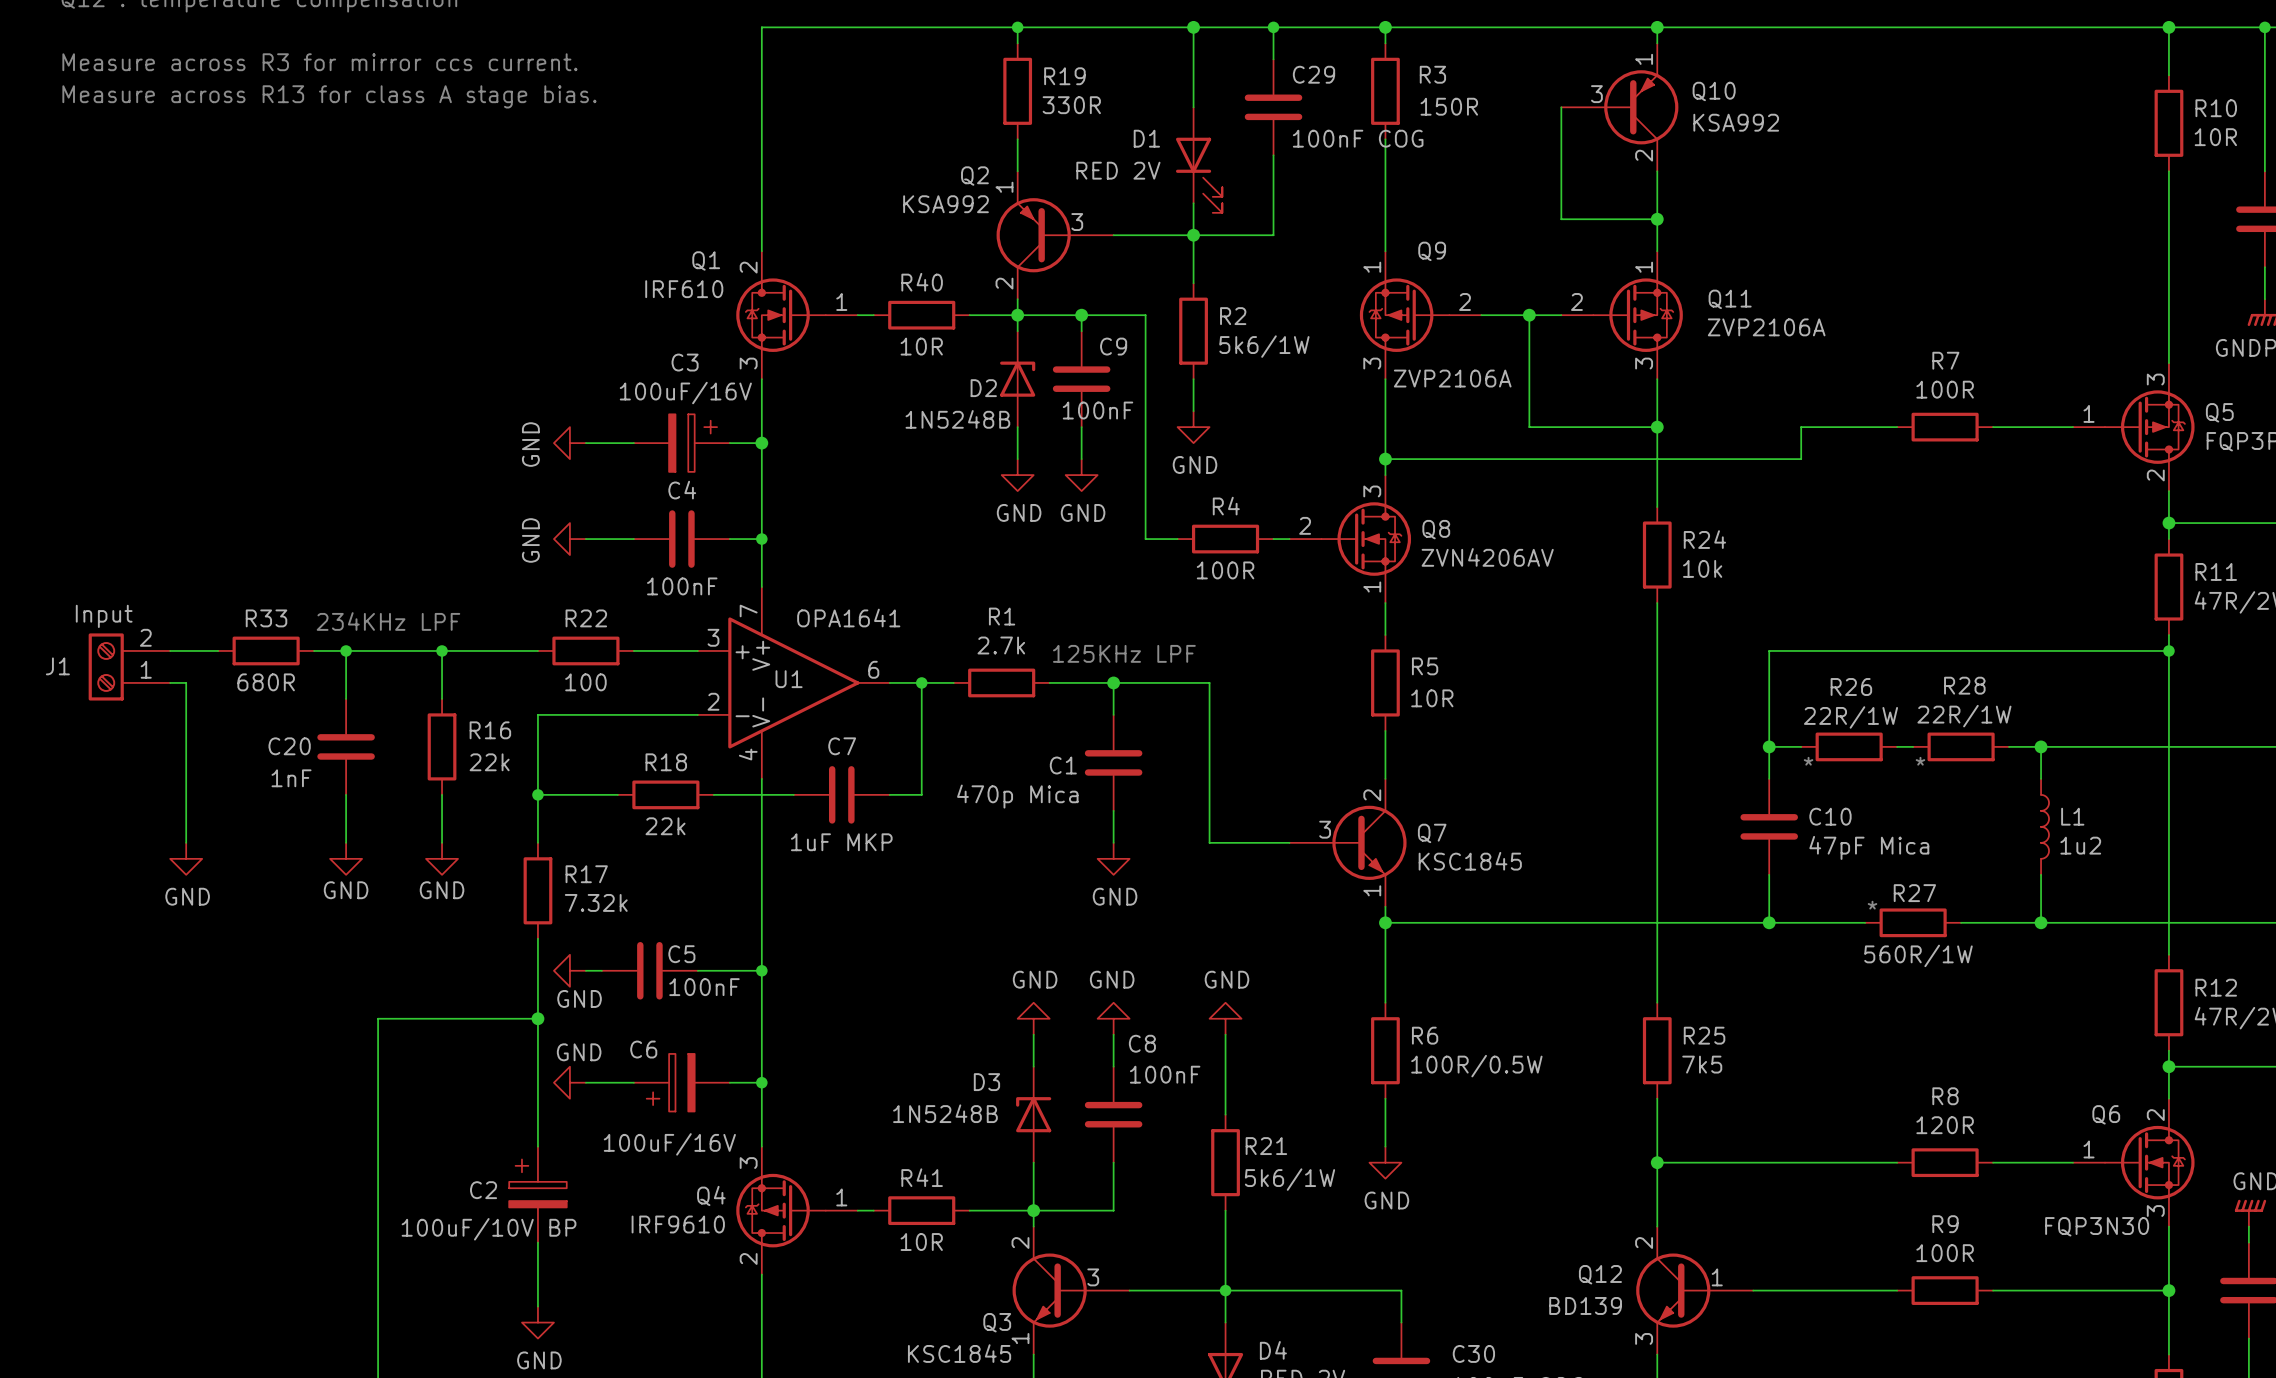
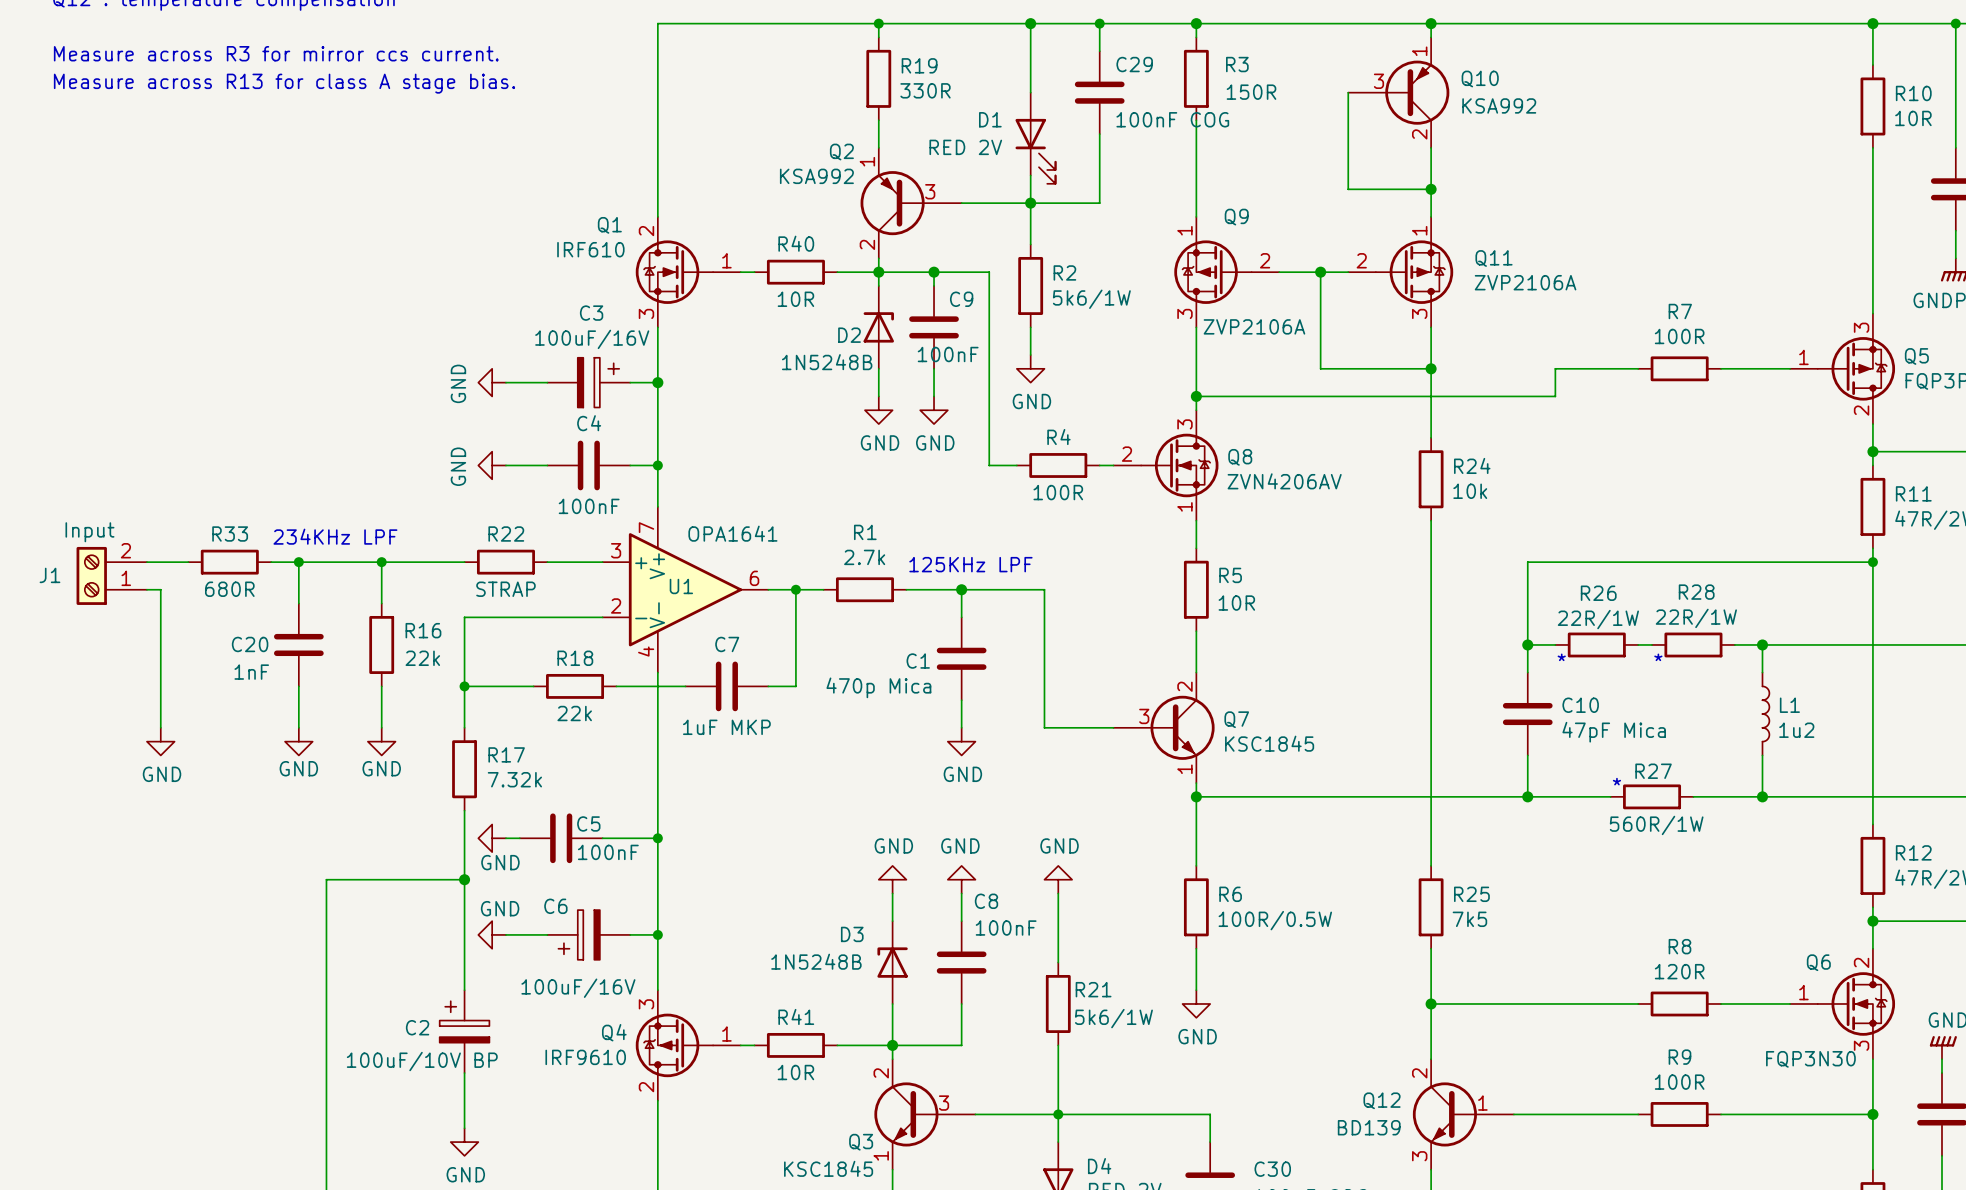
R22 value: 100 (585, 682) -> STRAP (505, 589)

